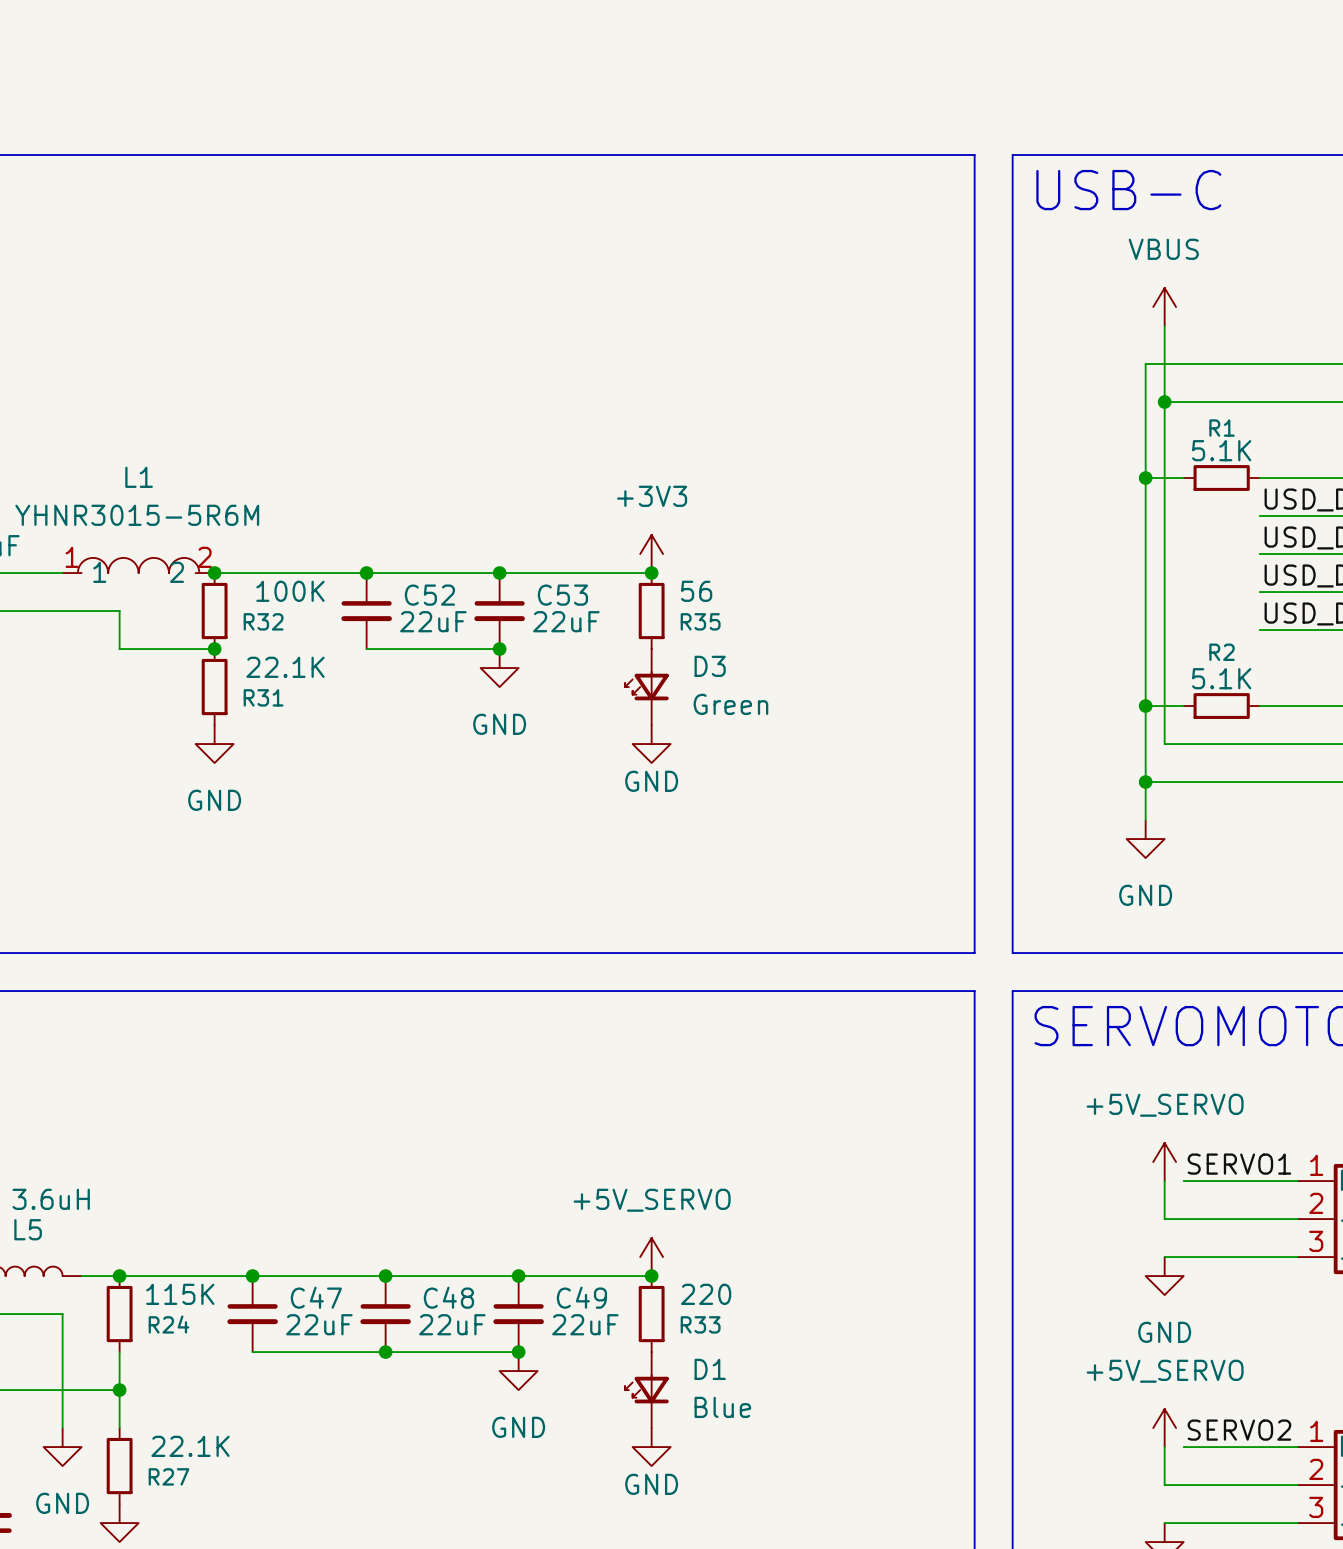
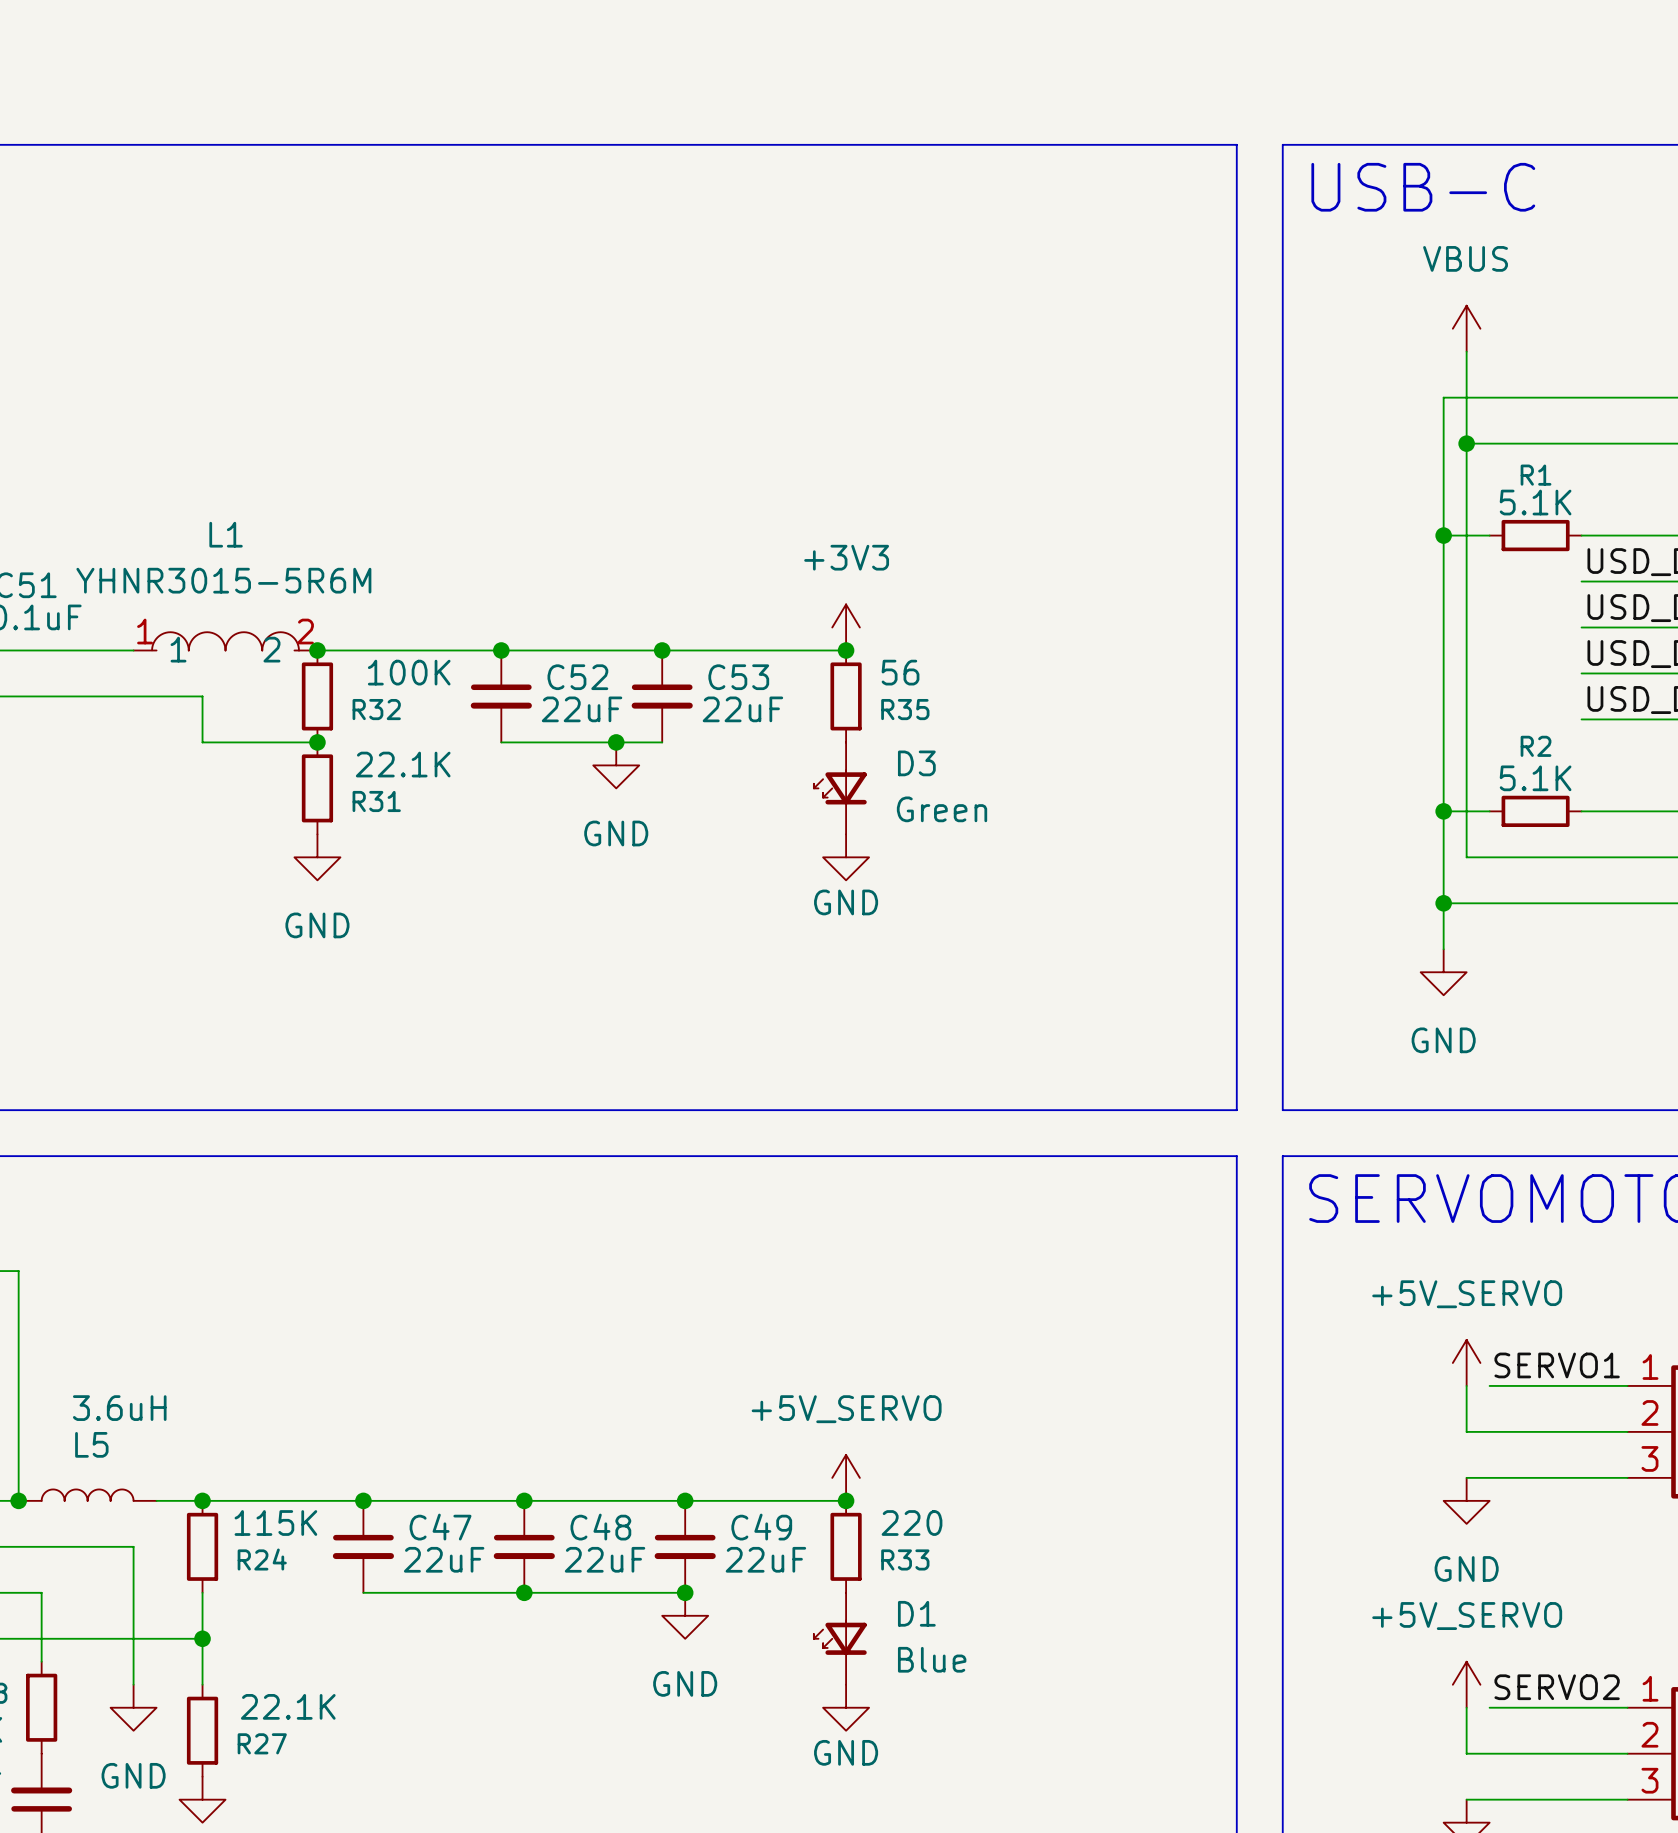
junction position: (499, 649) -> (616, 742)
power symbol position: GND (499, 668) -> GND (616, 765)

